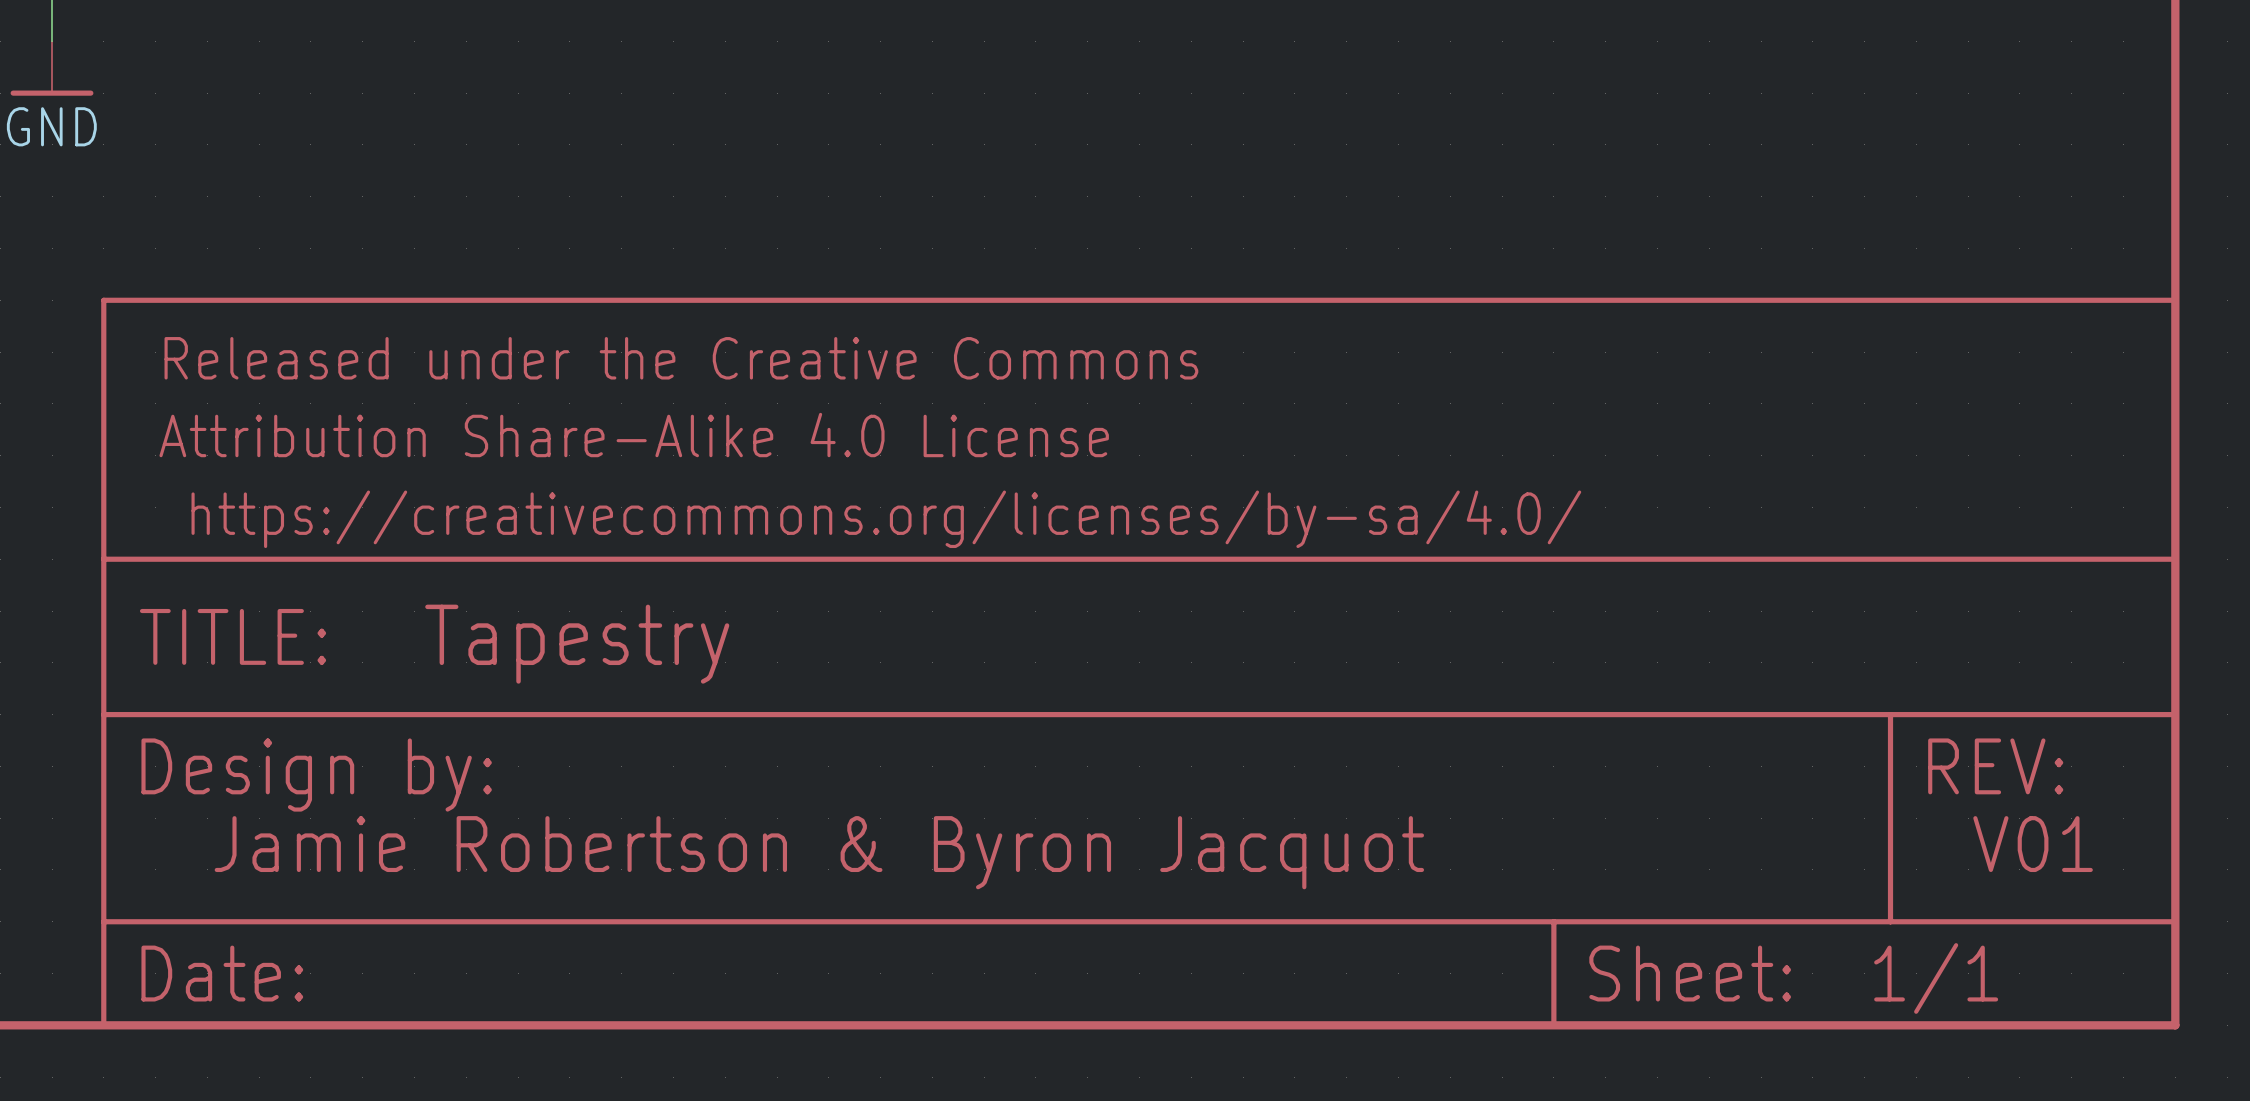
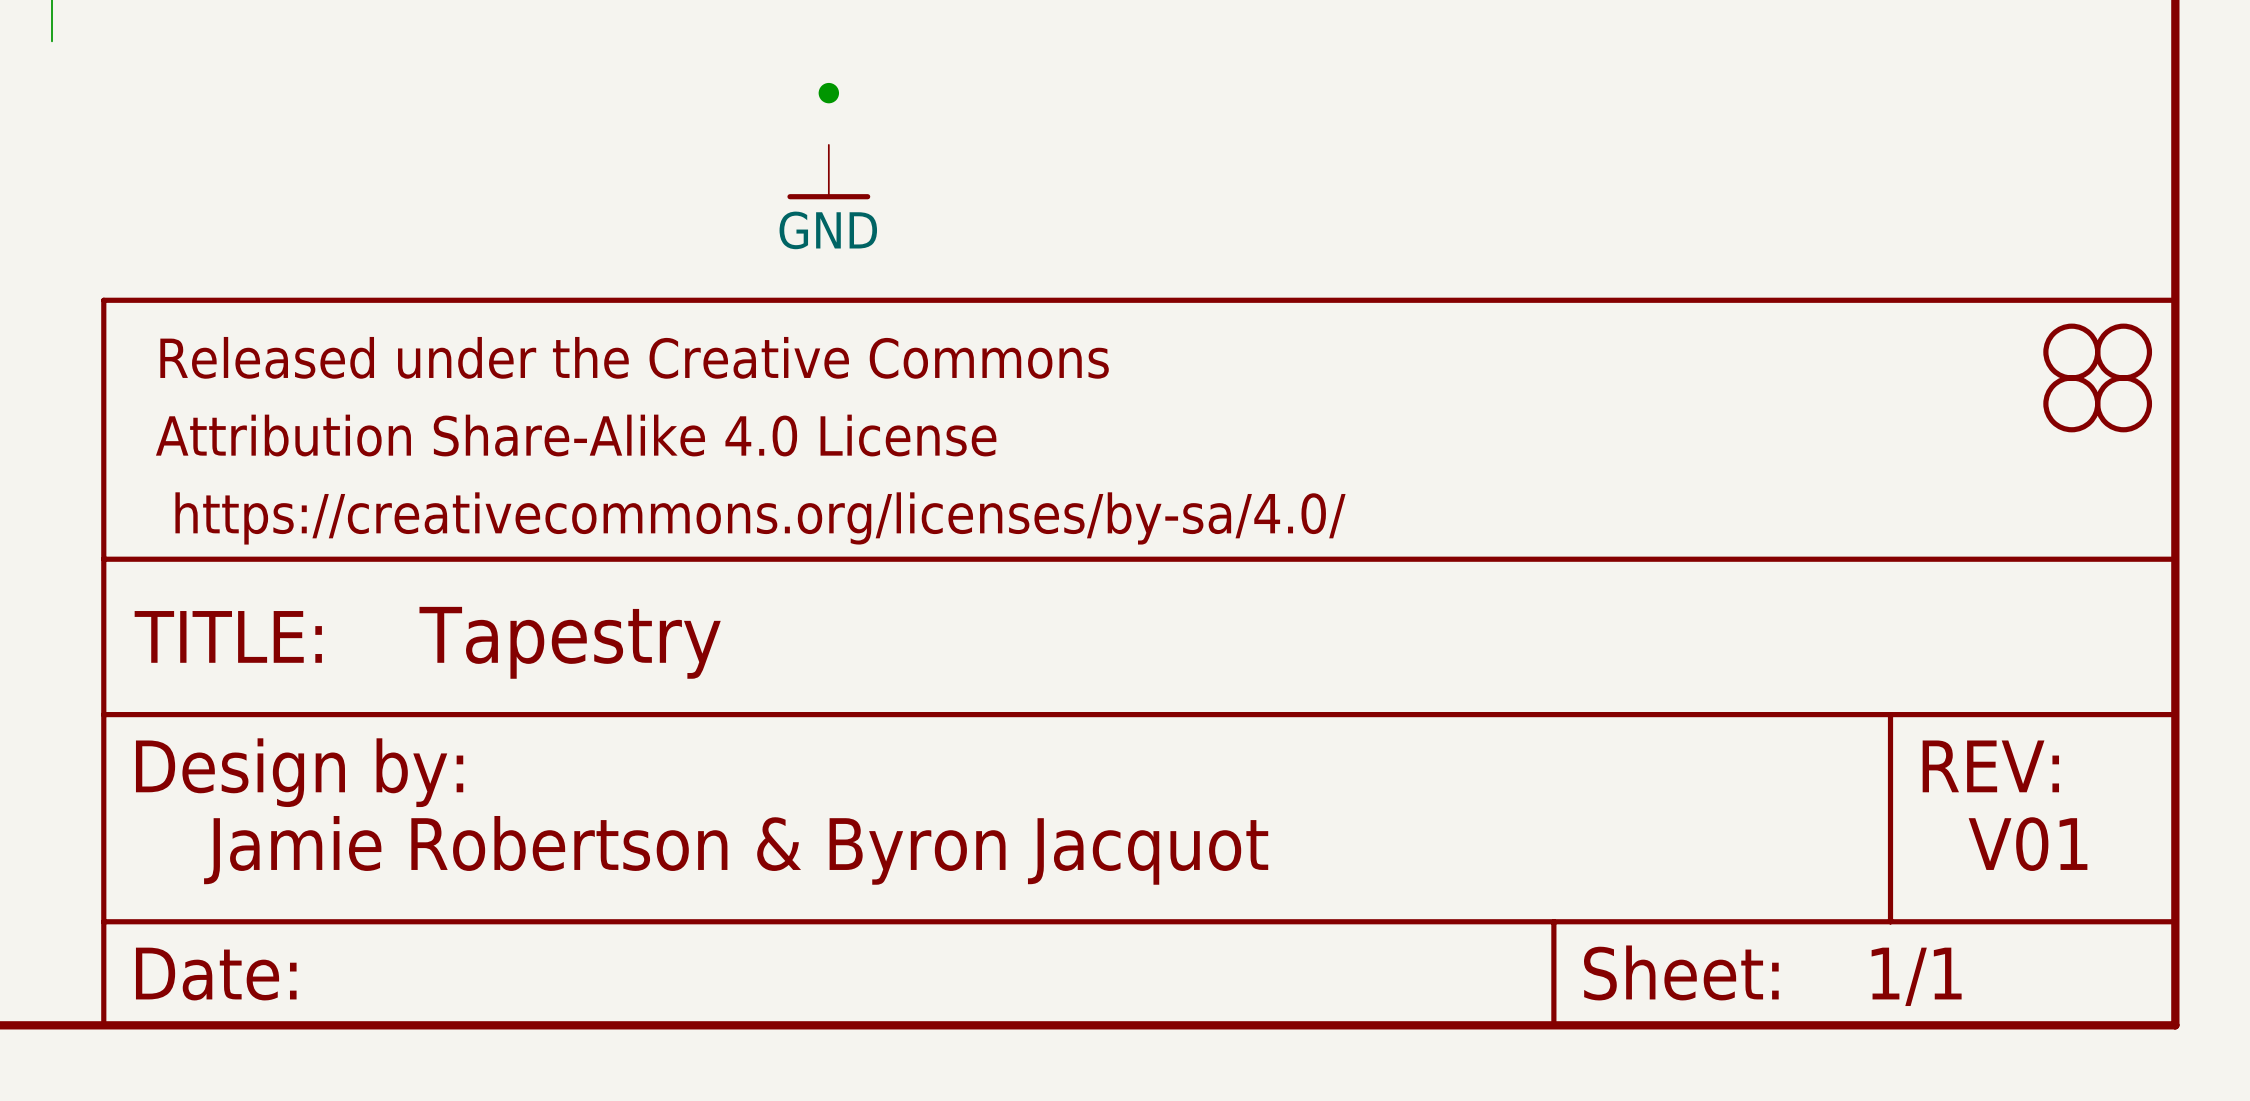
power symbol: GND (52, 68) -> none
junction: none -> (828, 93)
power symbol: none -> GND (828, 172)
part: none -> (2071, 352)
part: none -> (2123, 352)
part: none -> (2071, 403)
part: none -> (2123, 403)

